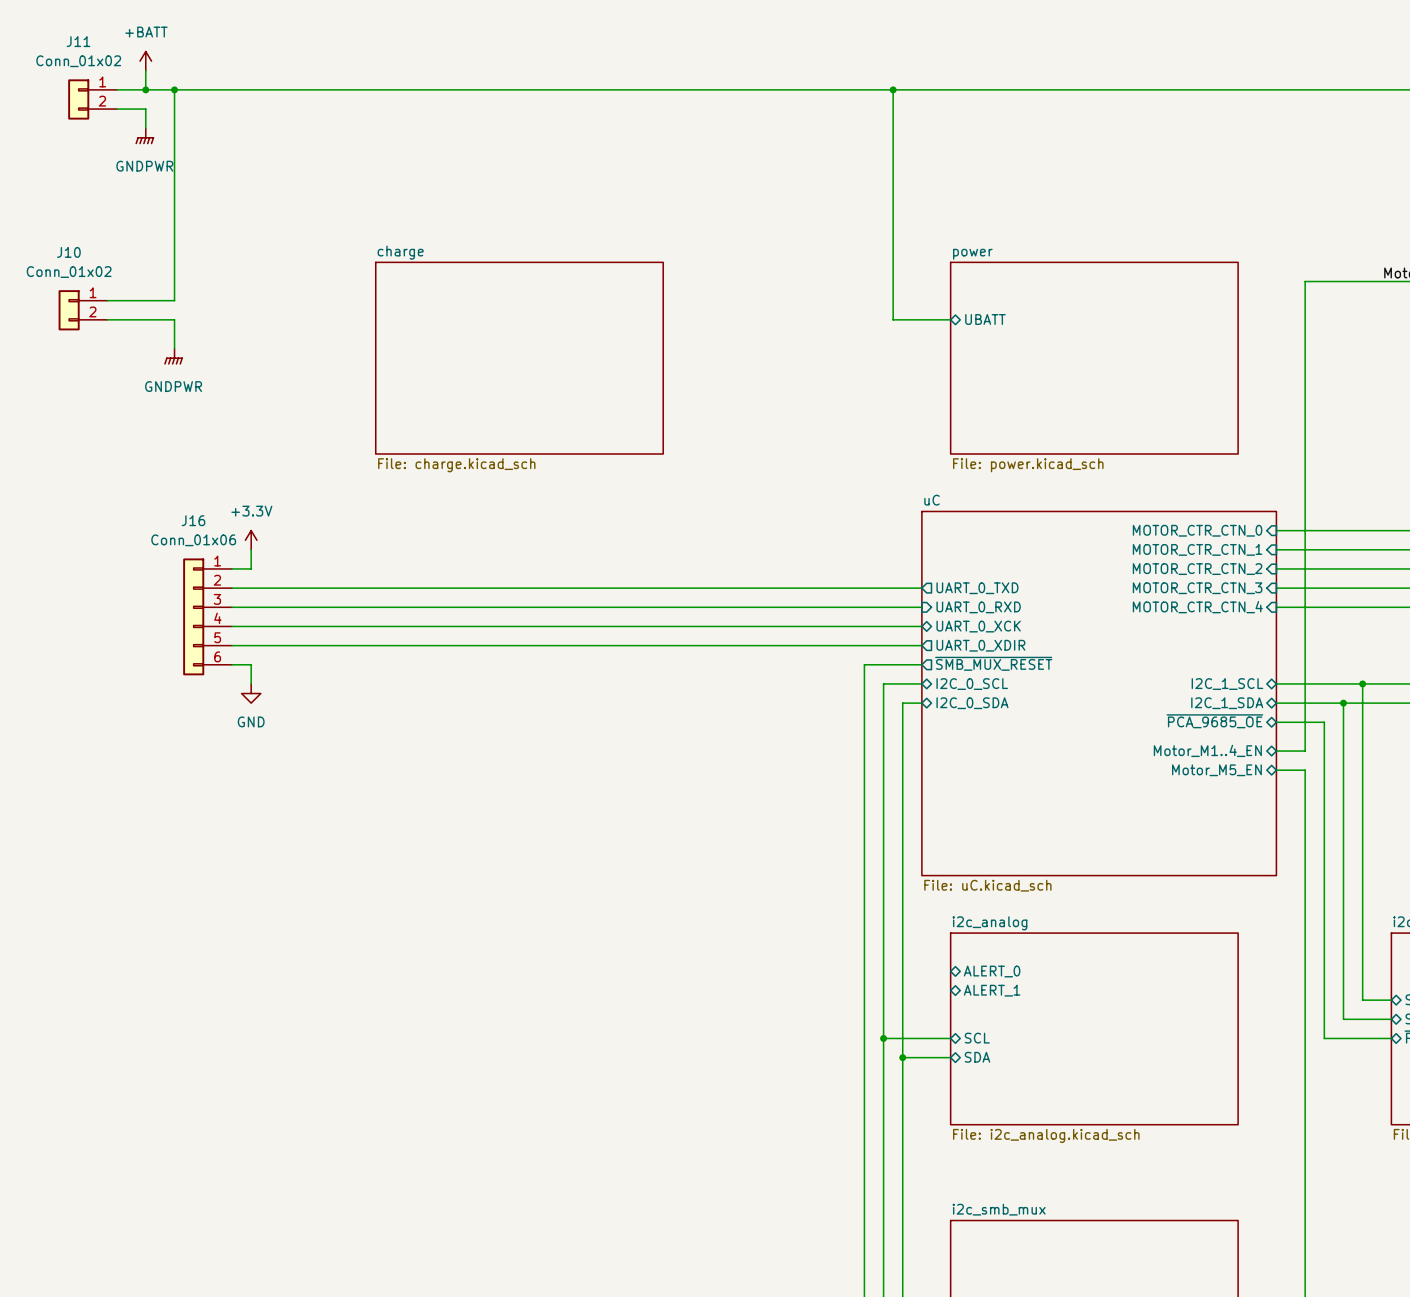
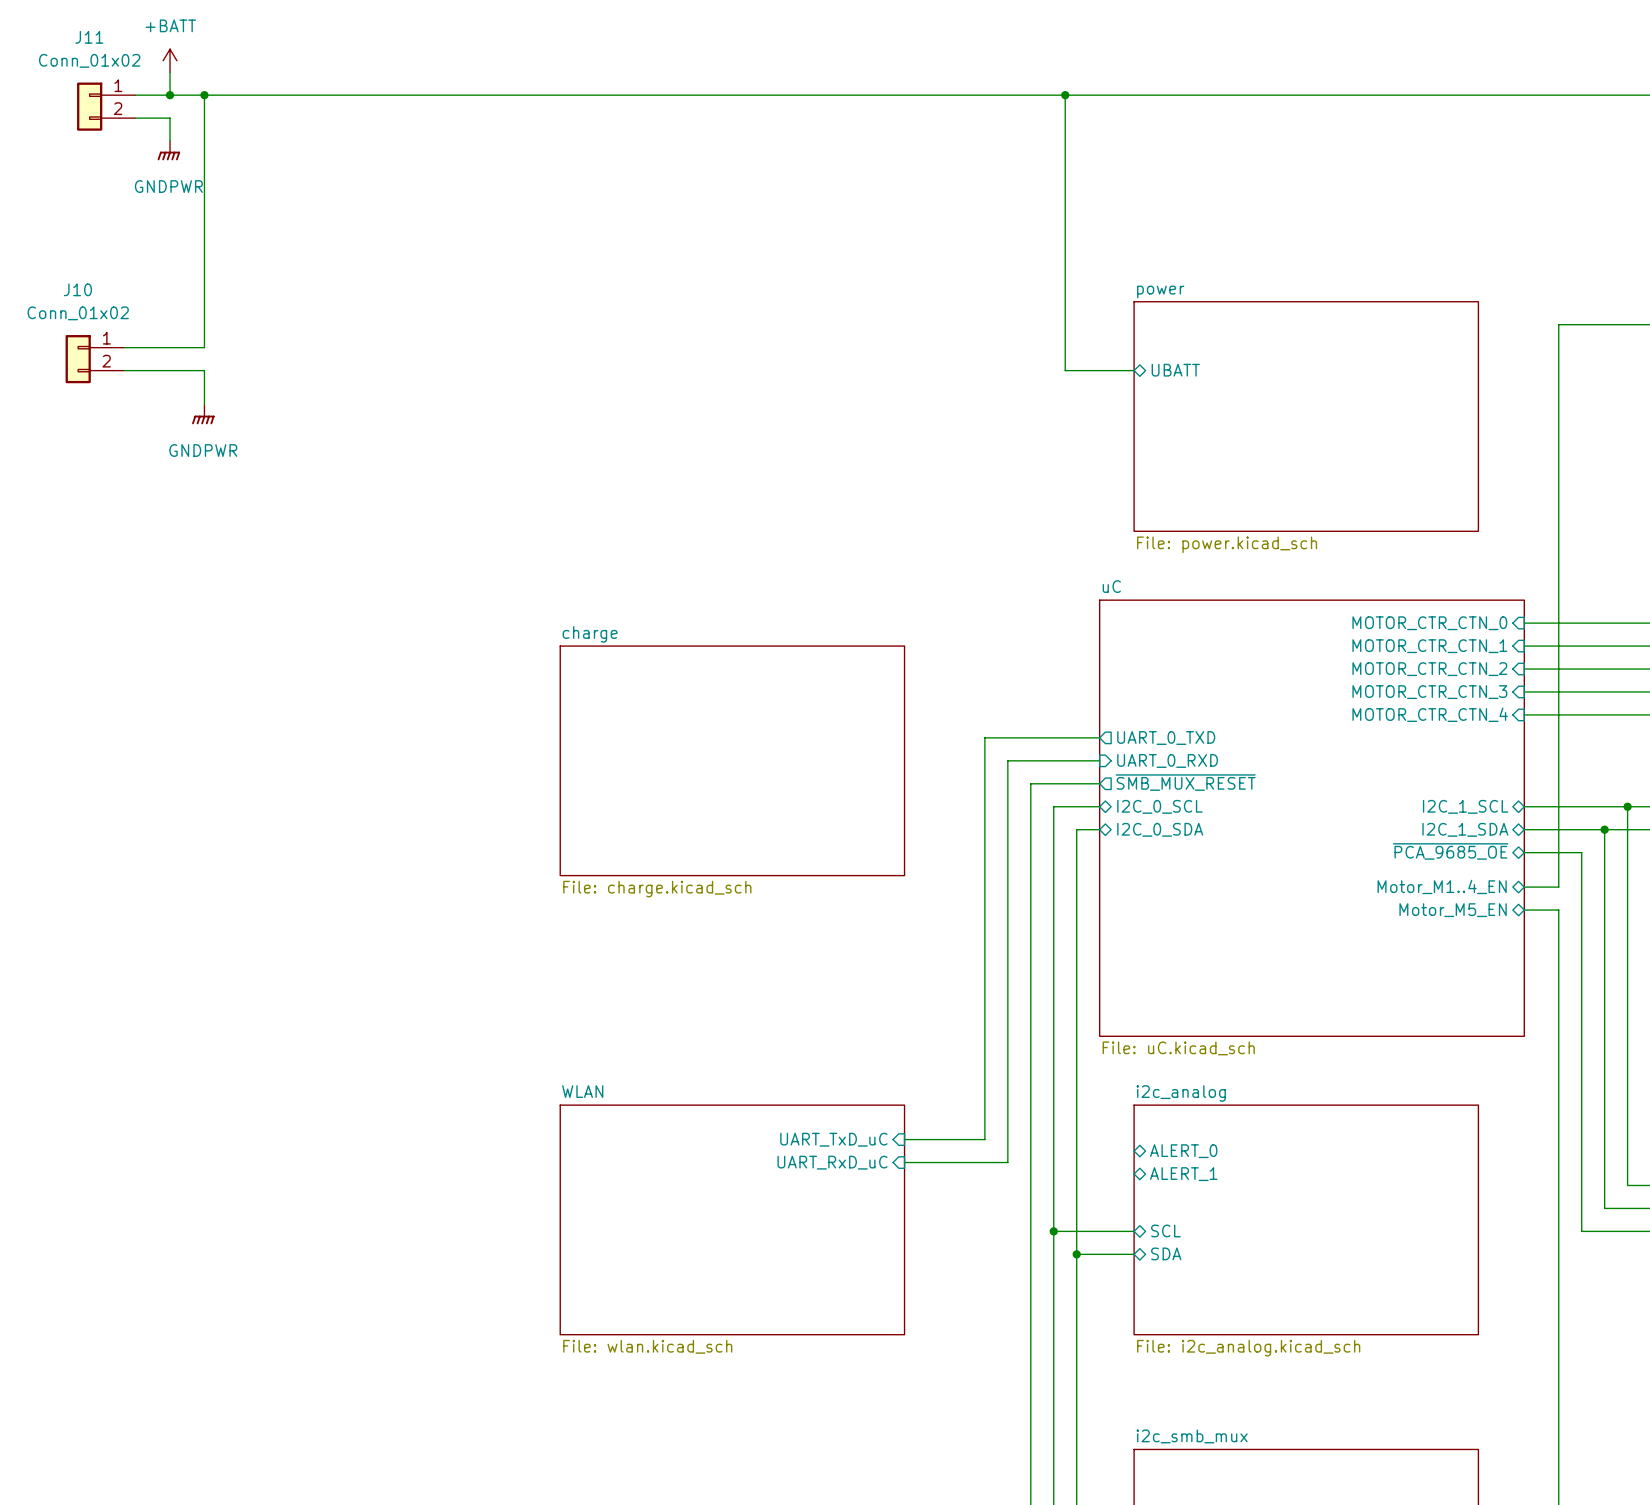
sheet charge: File: charge.kicad_sch (519, 358) -> none
power symbol: +3.3V (251, 540) -> none
wire: (251, 549) (251, 568) (232, 568) -> none
wire: (232, 588) (921, 588) -> none
sheet pin: UART_0_TXD (977, 588) -> none
wire: (232, 607) (921, 607) -> none
sheet pin: UART_0_RXD (978, 607) -> none
J16: Conn_01x06 (207, 616) -> none
wire: (232, 626) (826, 626) -> (904, 1139) (984, 1139) (984, 737)
sheet pin shape: bidirectional (978, 626) -> output (1166, 738)
sheet pin: UART_0_XCK (978, 626) -> UART_0_TXD (1166, 738)
wire: (232, 645) (845, 645) -> (904, 1162) (1007, 1162) (1007, 760)
sheet charge: none -> File: charge.kicad_sch (732, 760)
sheet pin shape: output (980, 645) -> input (1167, 760)
sheet pin: UART_0_XDIR (980, 645) -> UART_0_RXD (1167, 760)
wire: (232, 664) (251, 664) (251, 683) -> none
power symbol: GND (251, 693) -> none
sheet pin: none -> UART_TxD_uC (833, 1139)
sheet pin: none -> UART_RxD_uC (832, 1162)
sheet WLAN: none -> File: wlan.kicad_sch (732, 1219)

